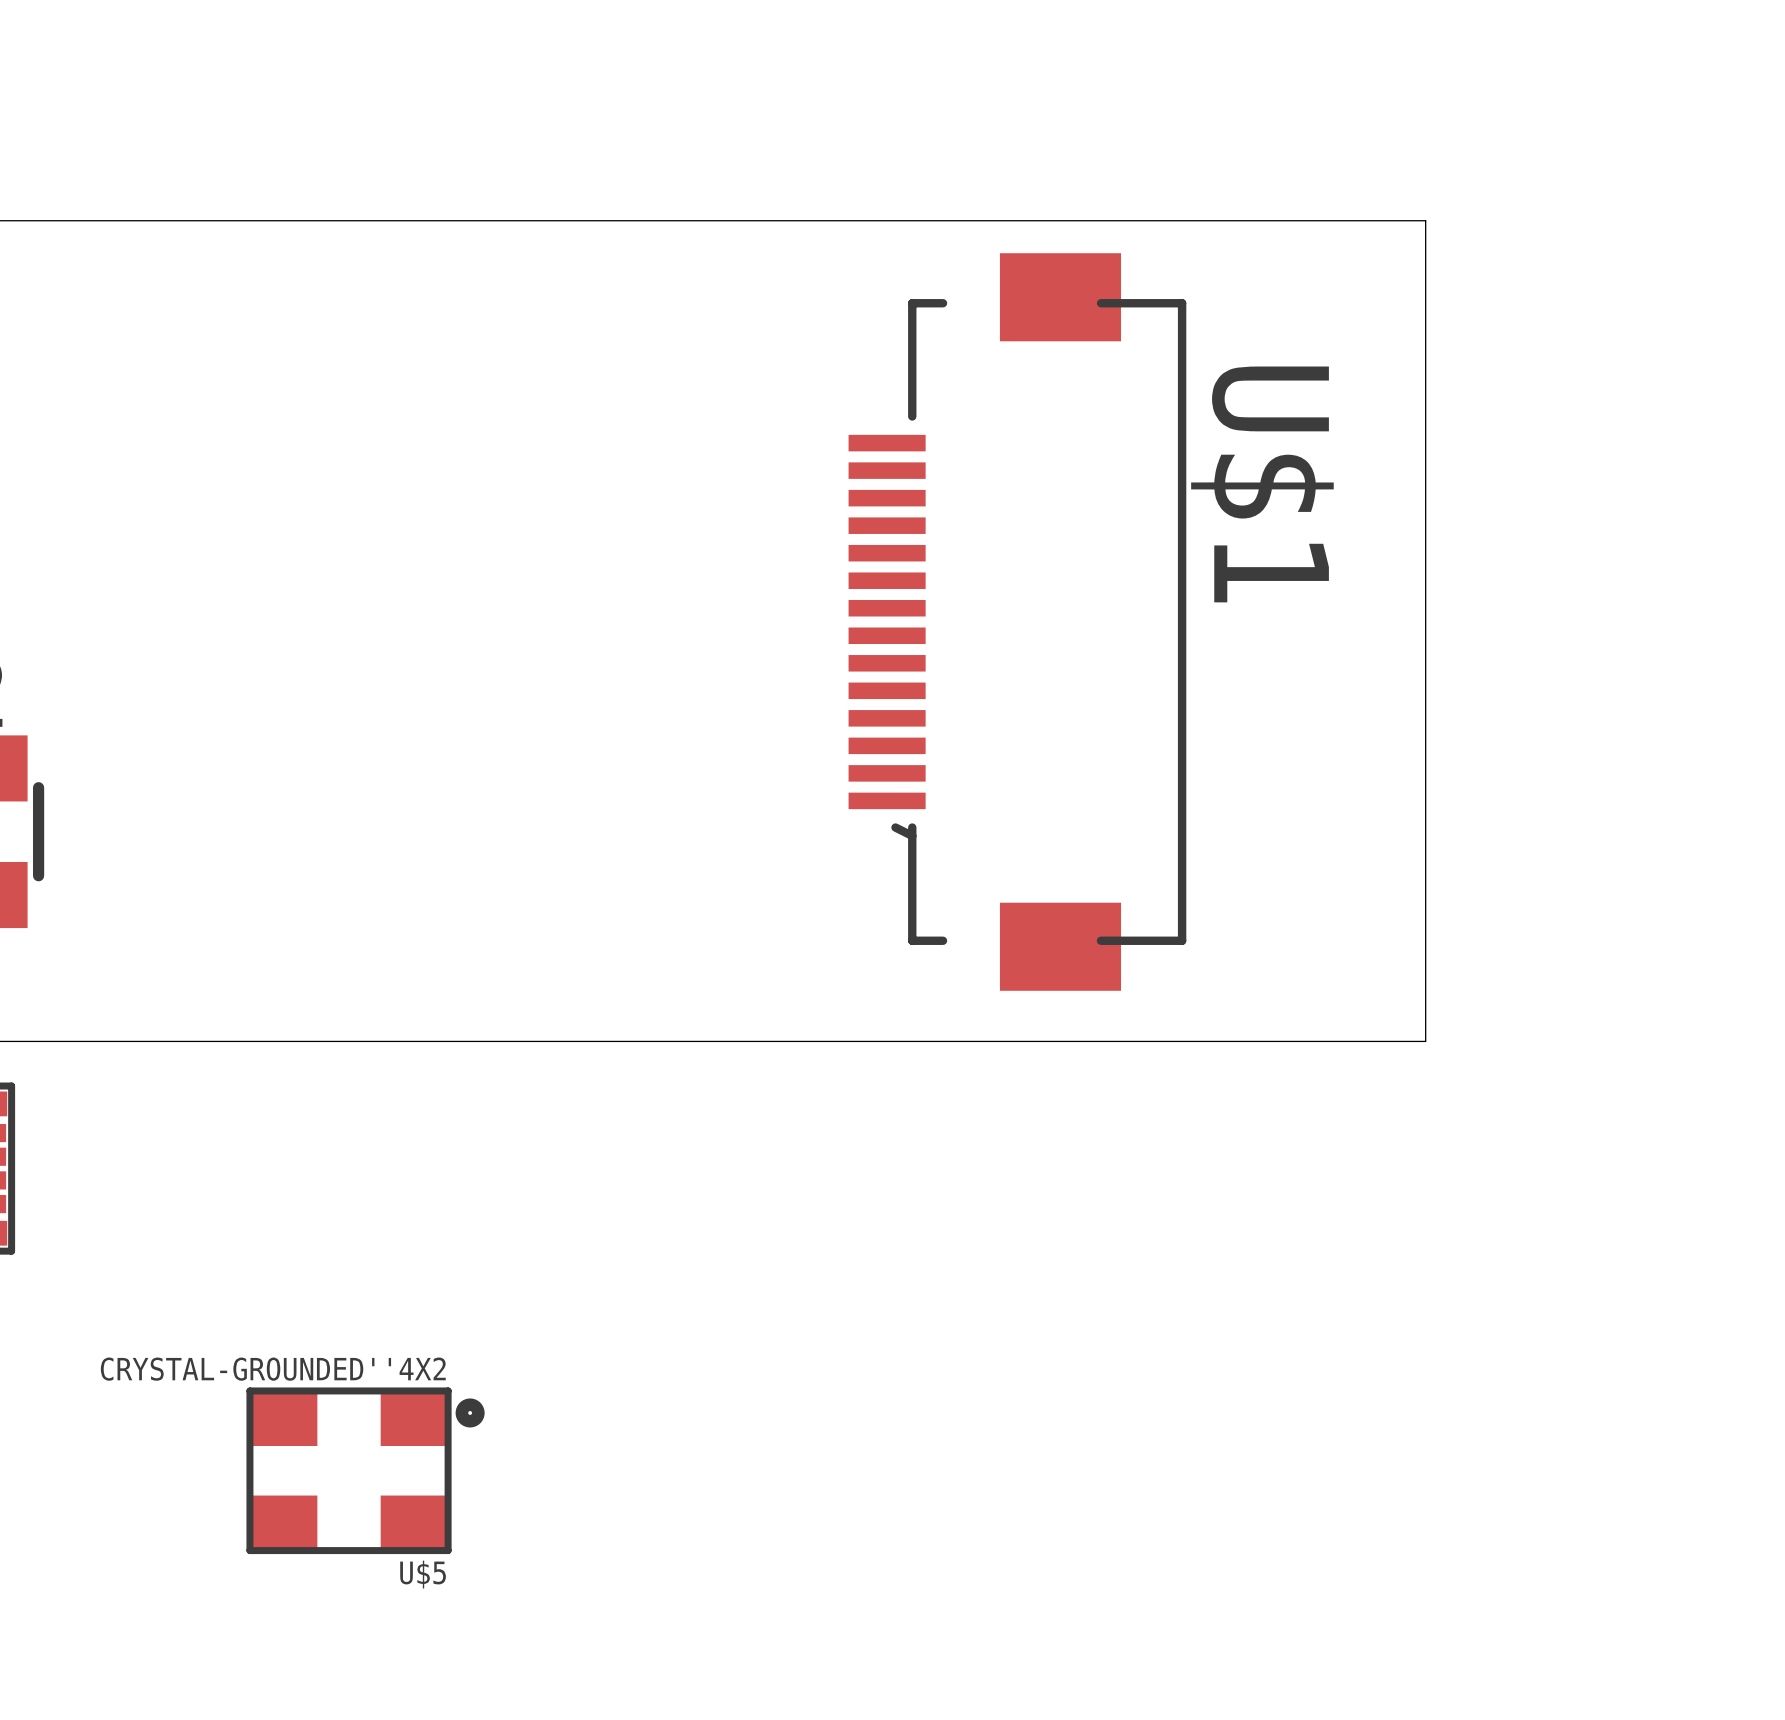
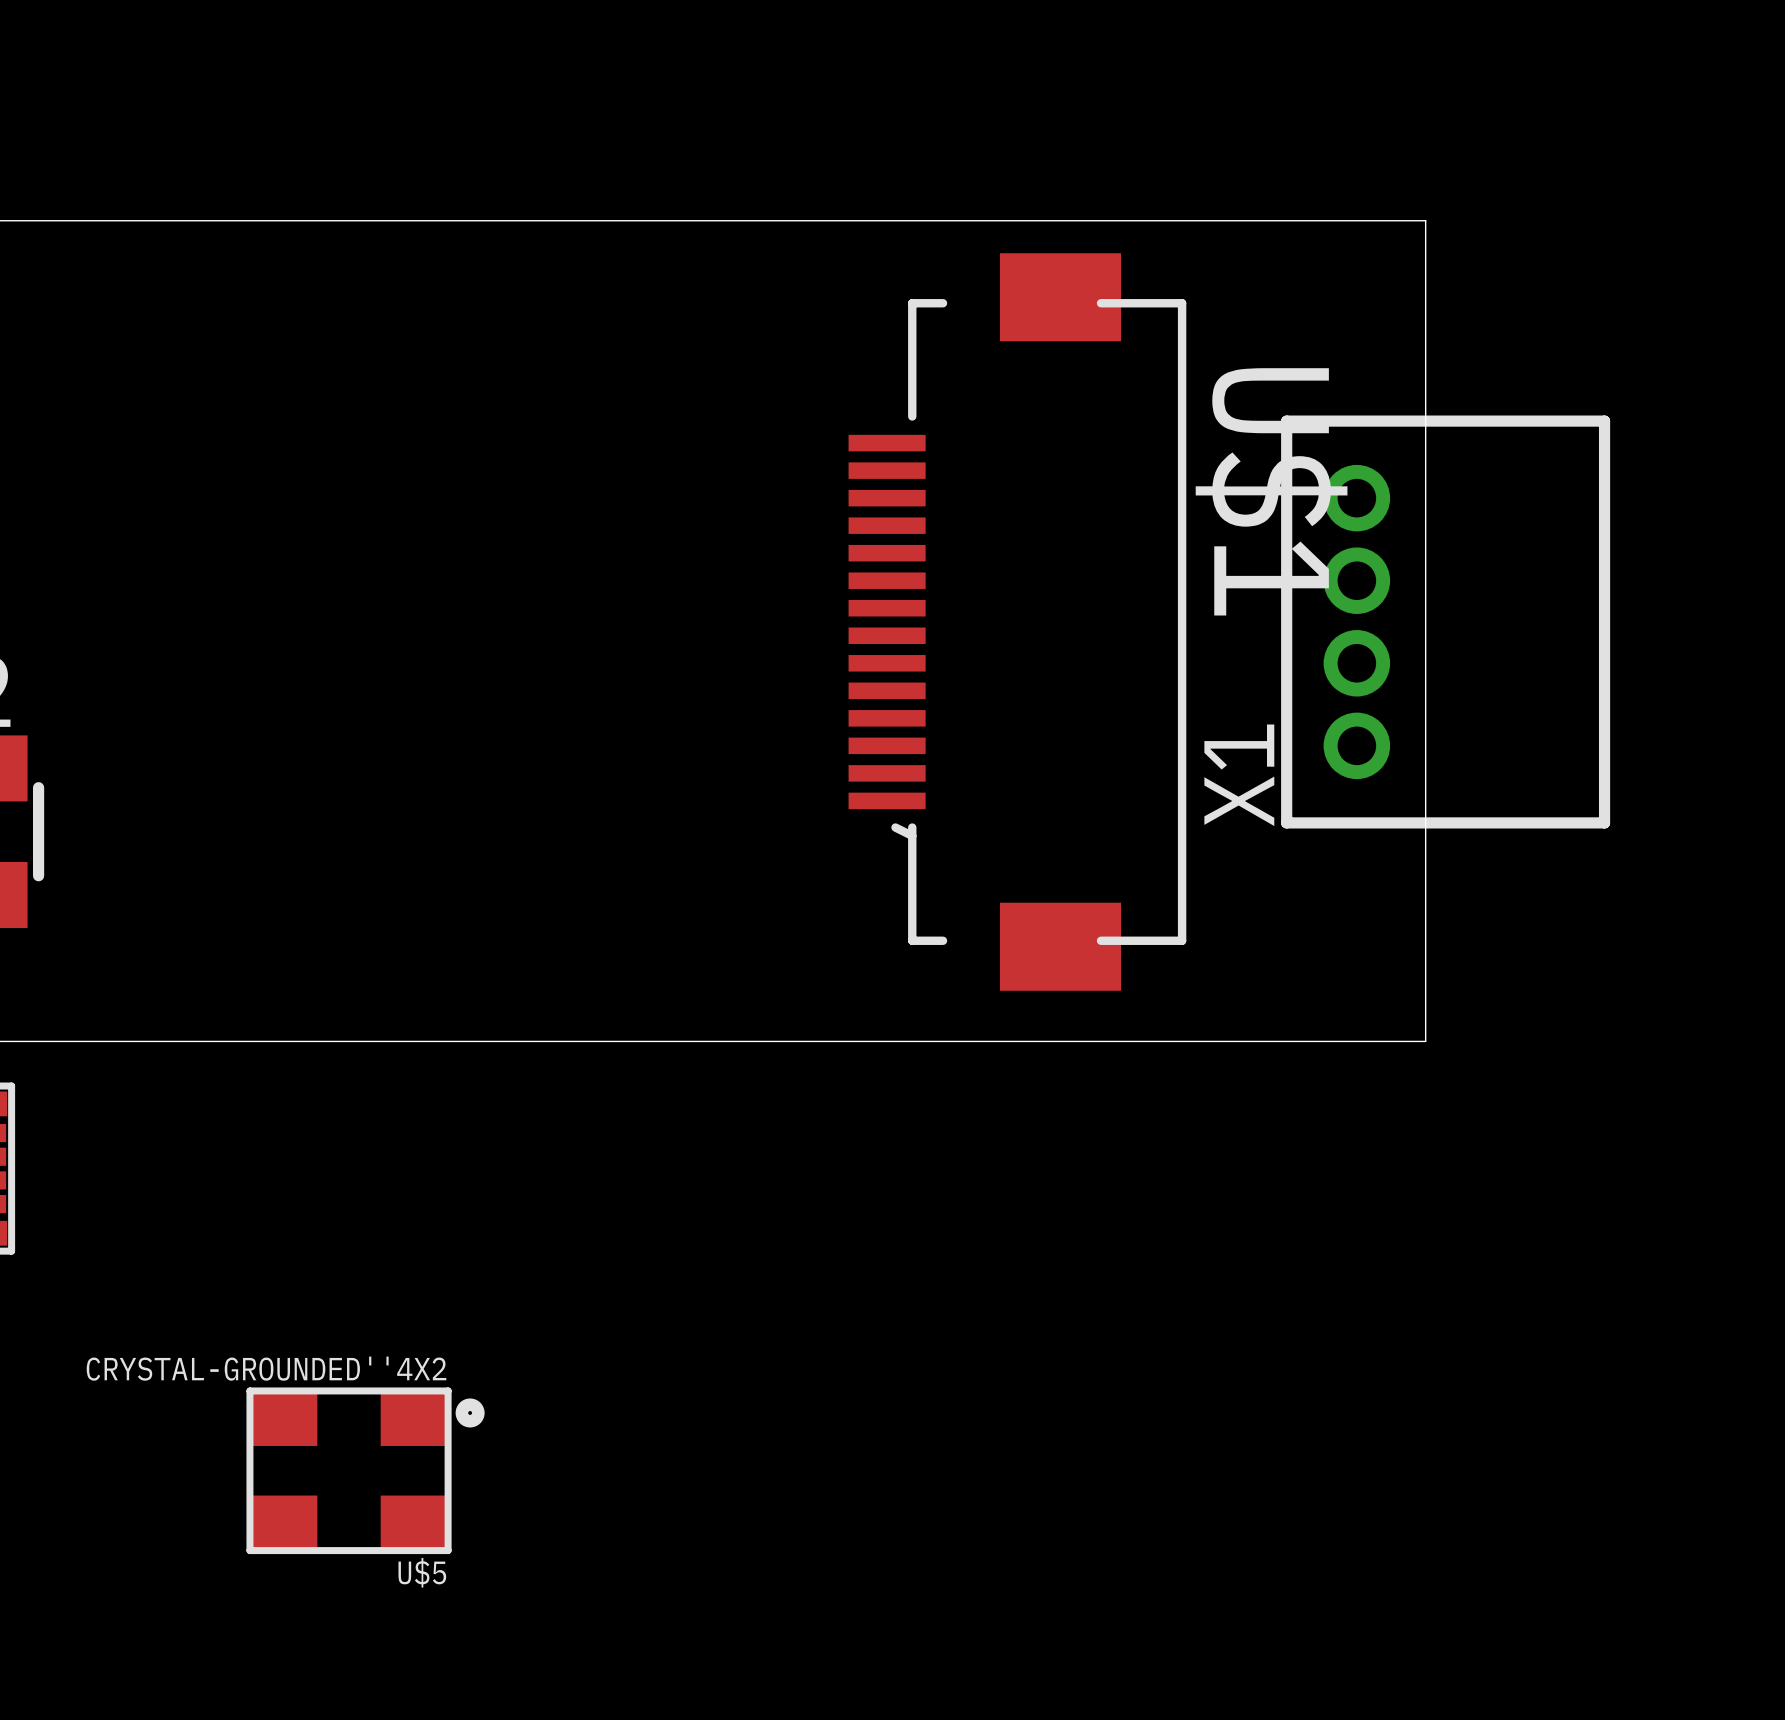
X1: none -> (1445, 622)

